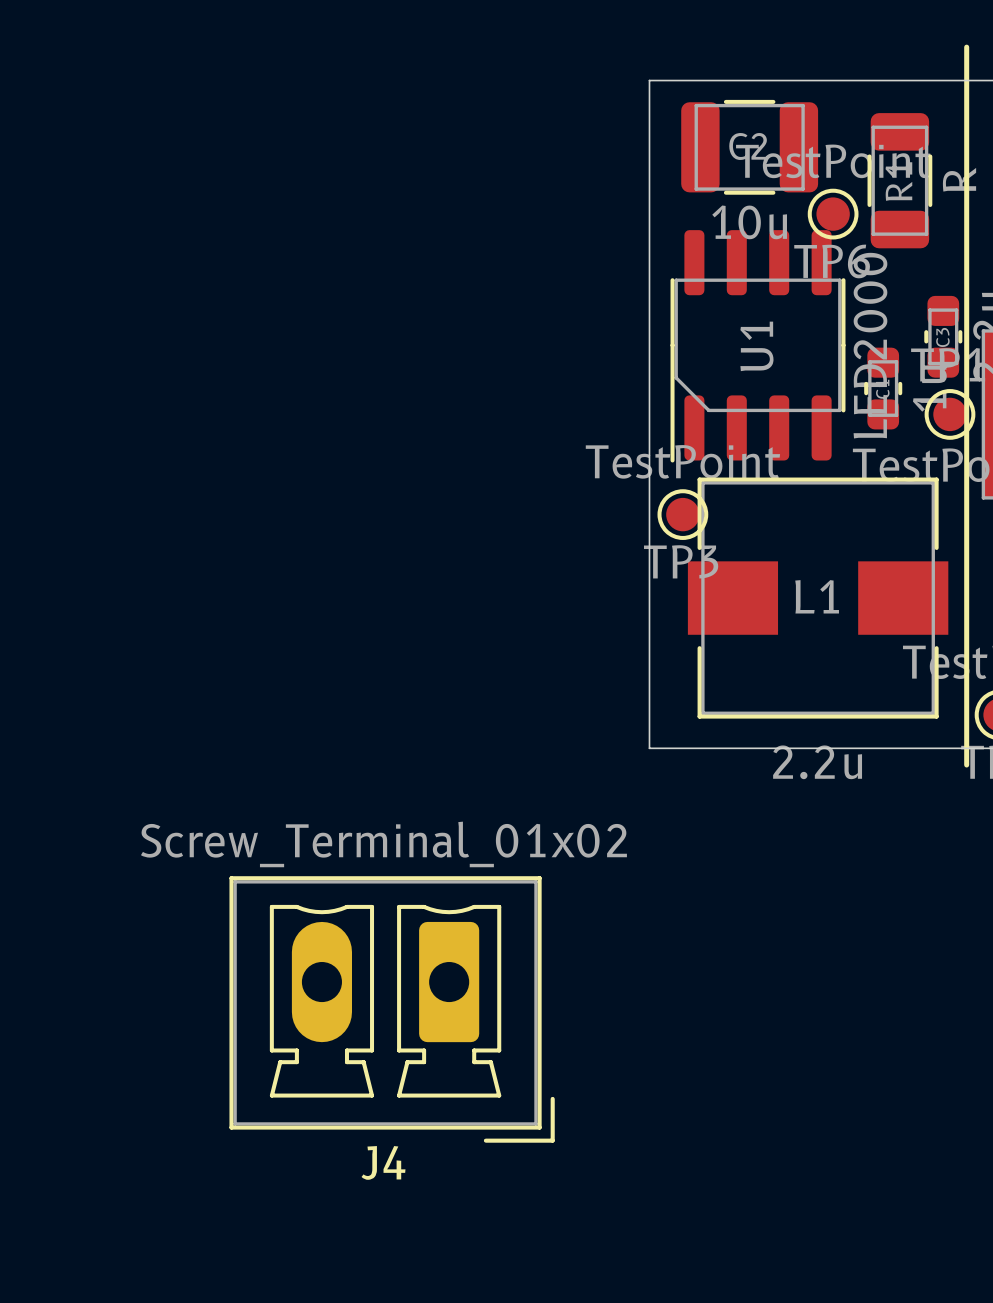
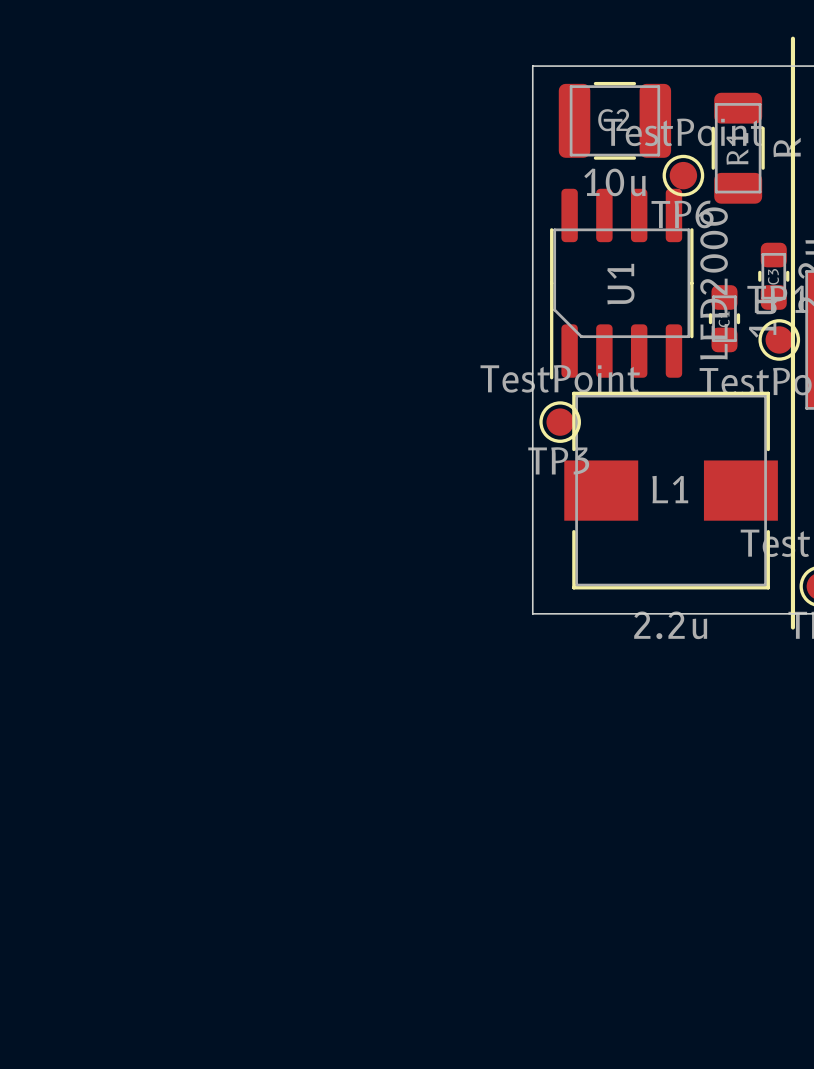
J4: Screw_Terminal_01x02 (392, 1009) -> none

